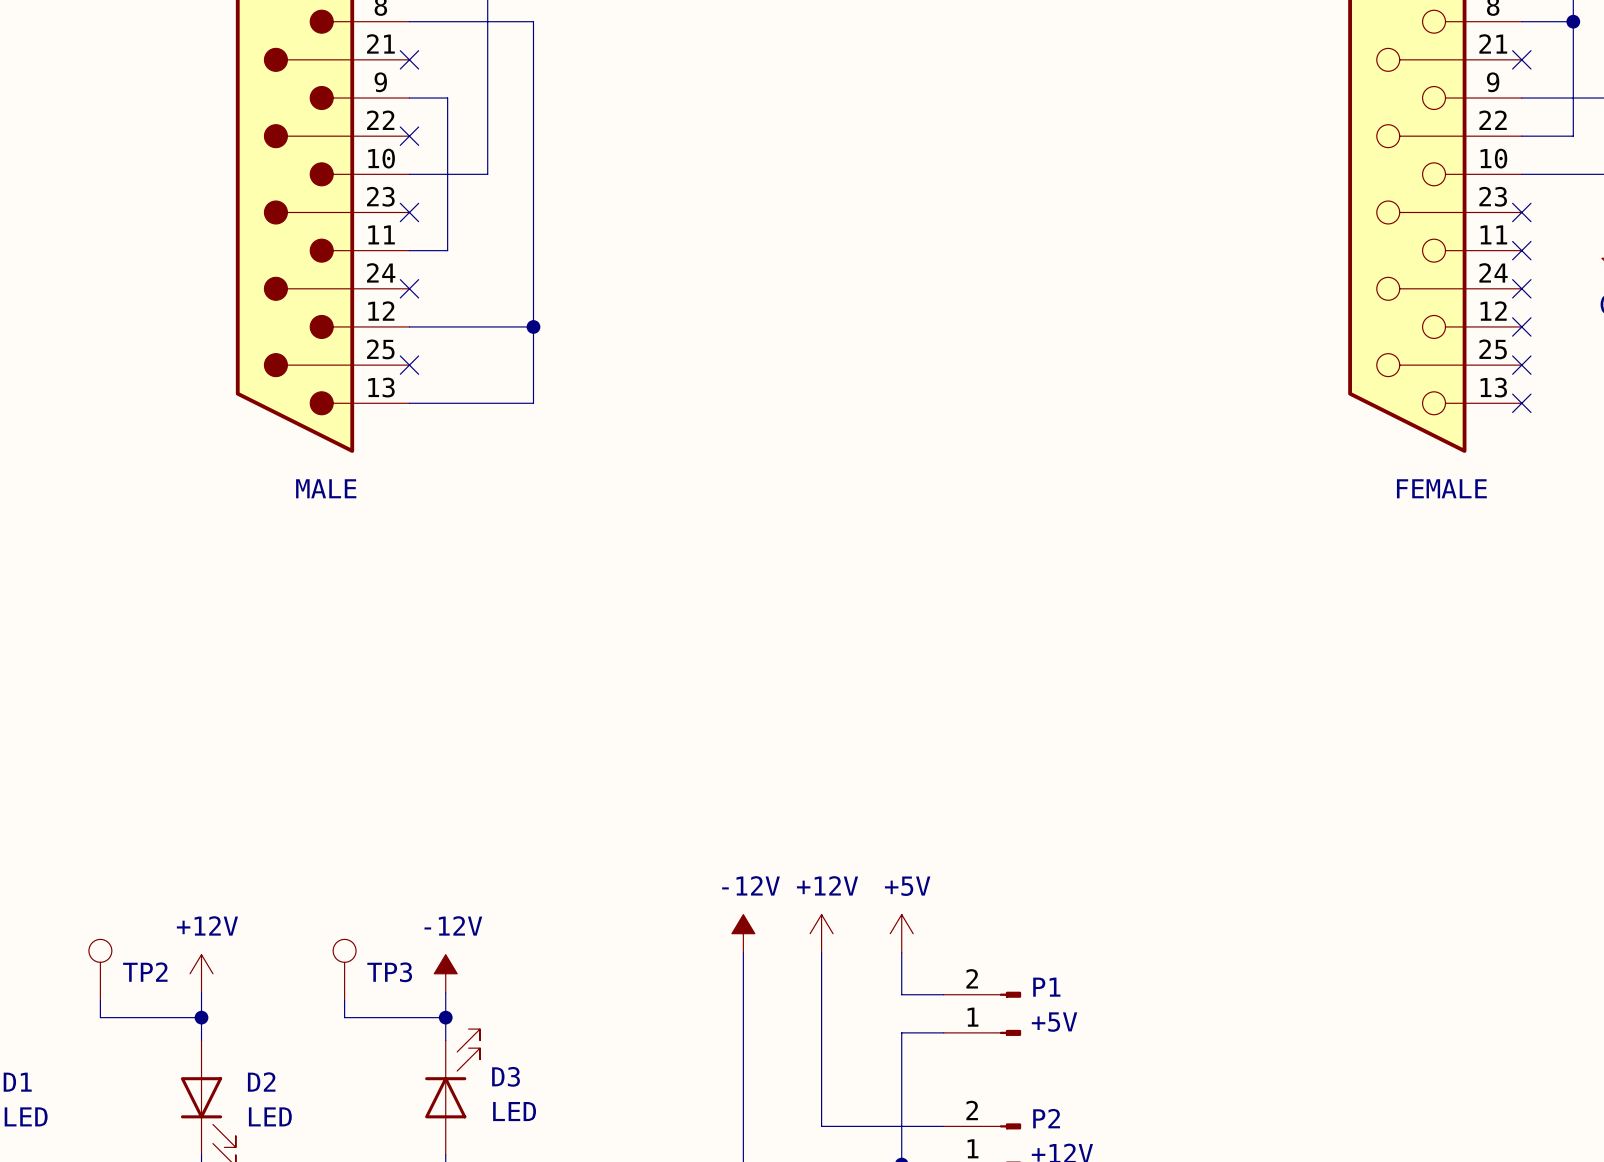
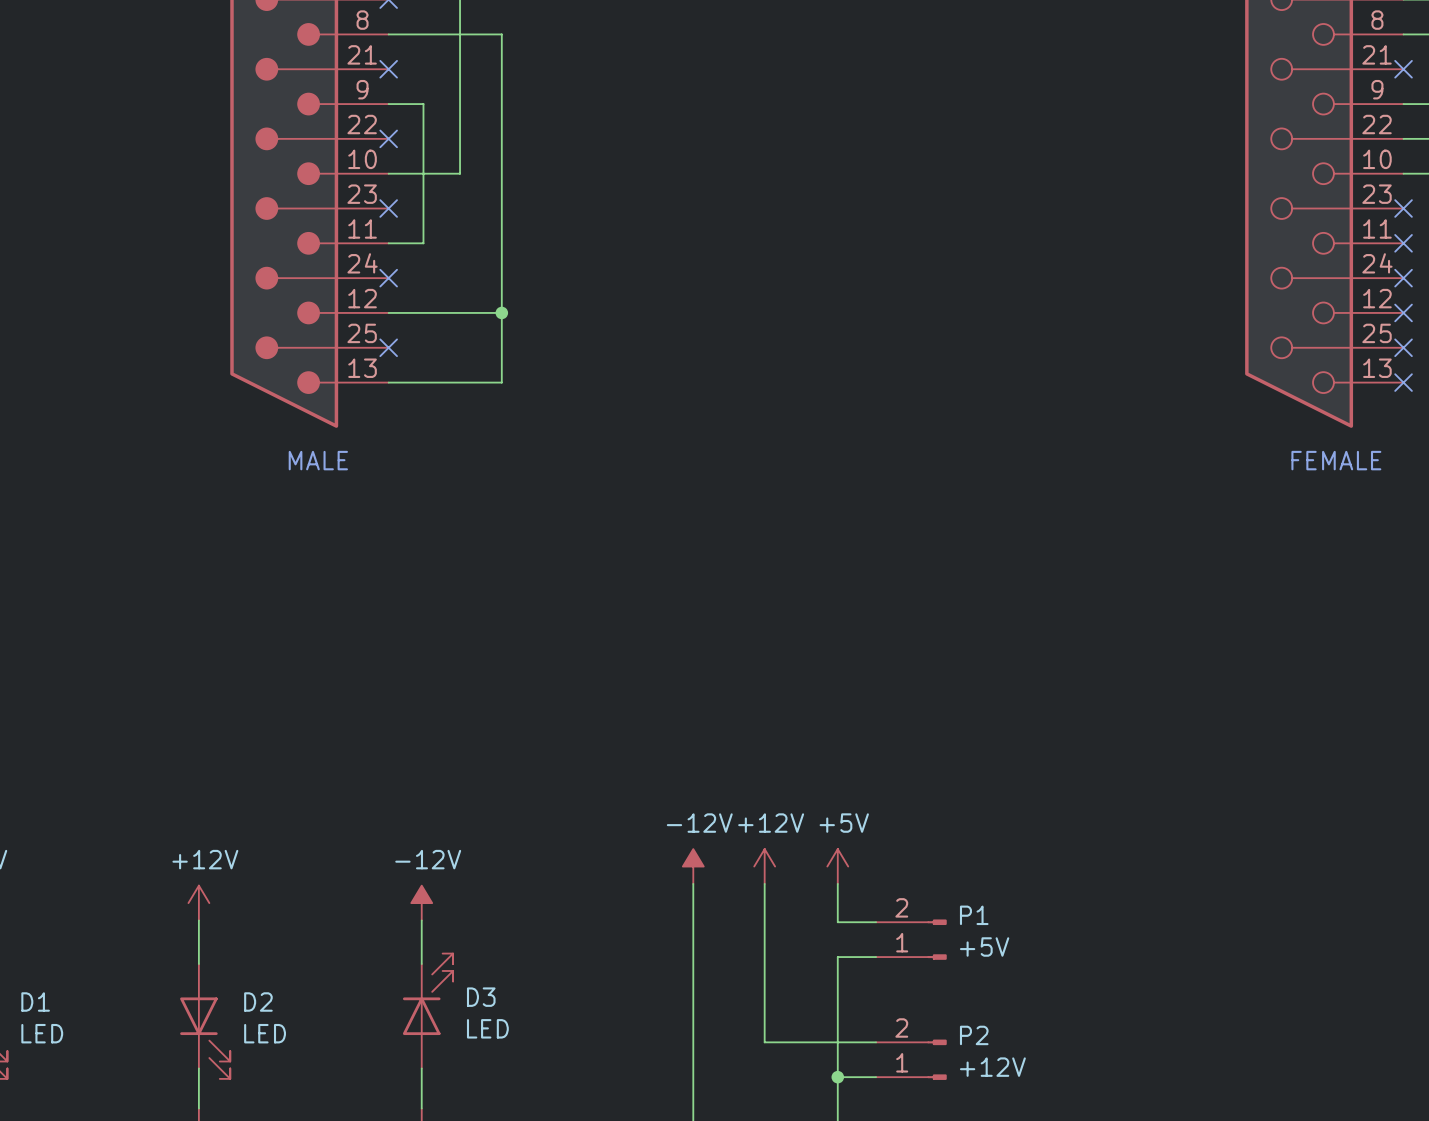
TP2: (100, 969) -> none
TP3: (344, 969) -> none
wire: (100, 1000) (100, 1017) (201, 1017) -> none
wire: (344, 1000) (344, 1017) (445, 1017) -> none
junction: (201, 1017) -> none
junction: (445, 1017) -> none

